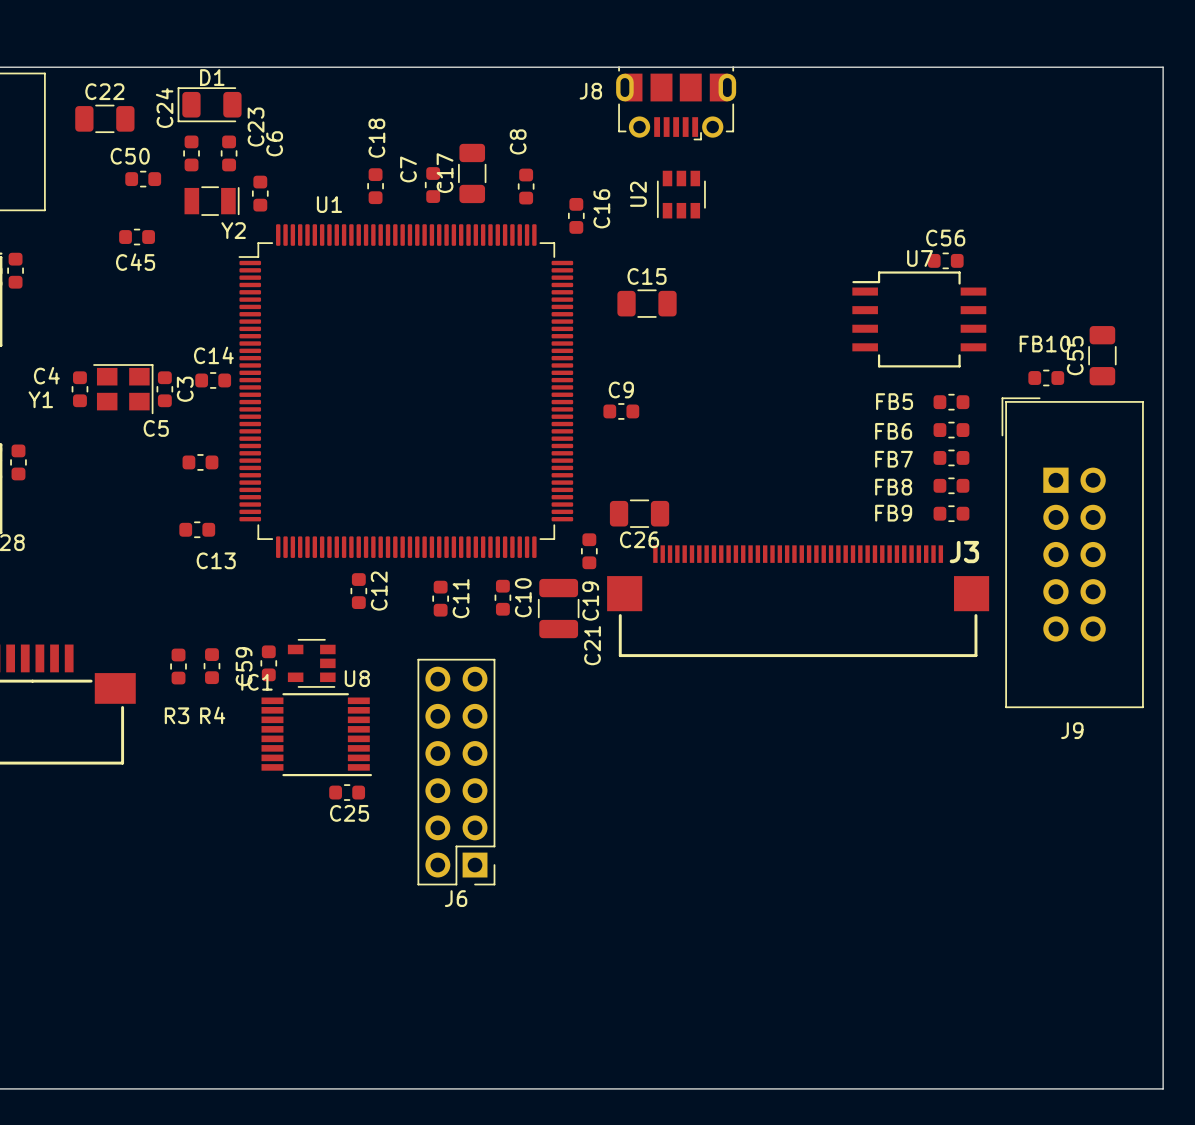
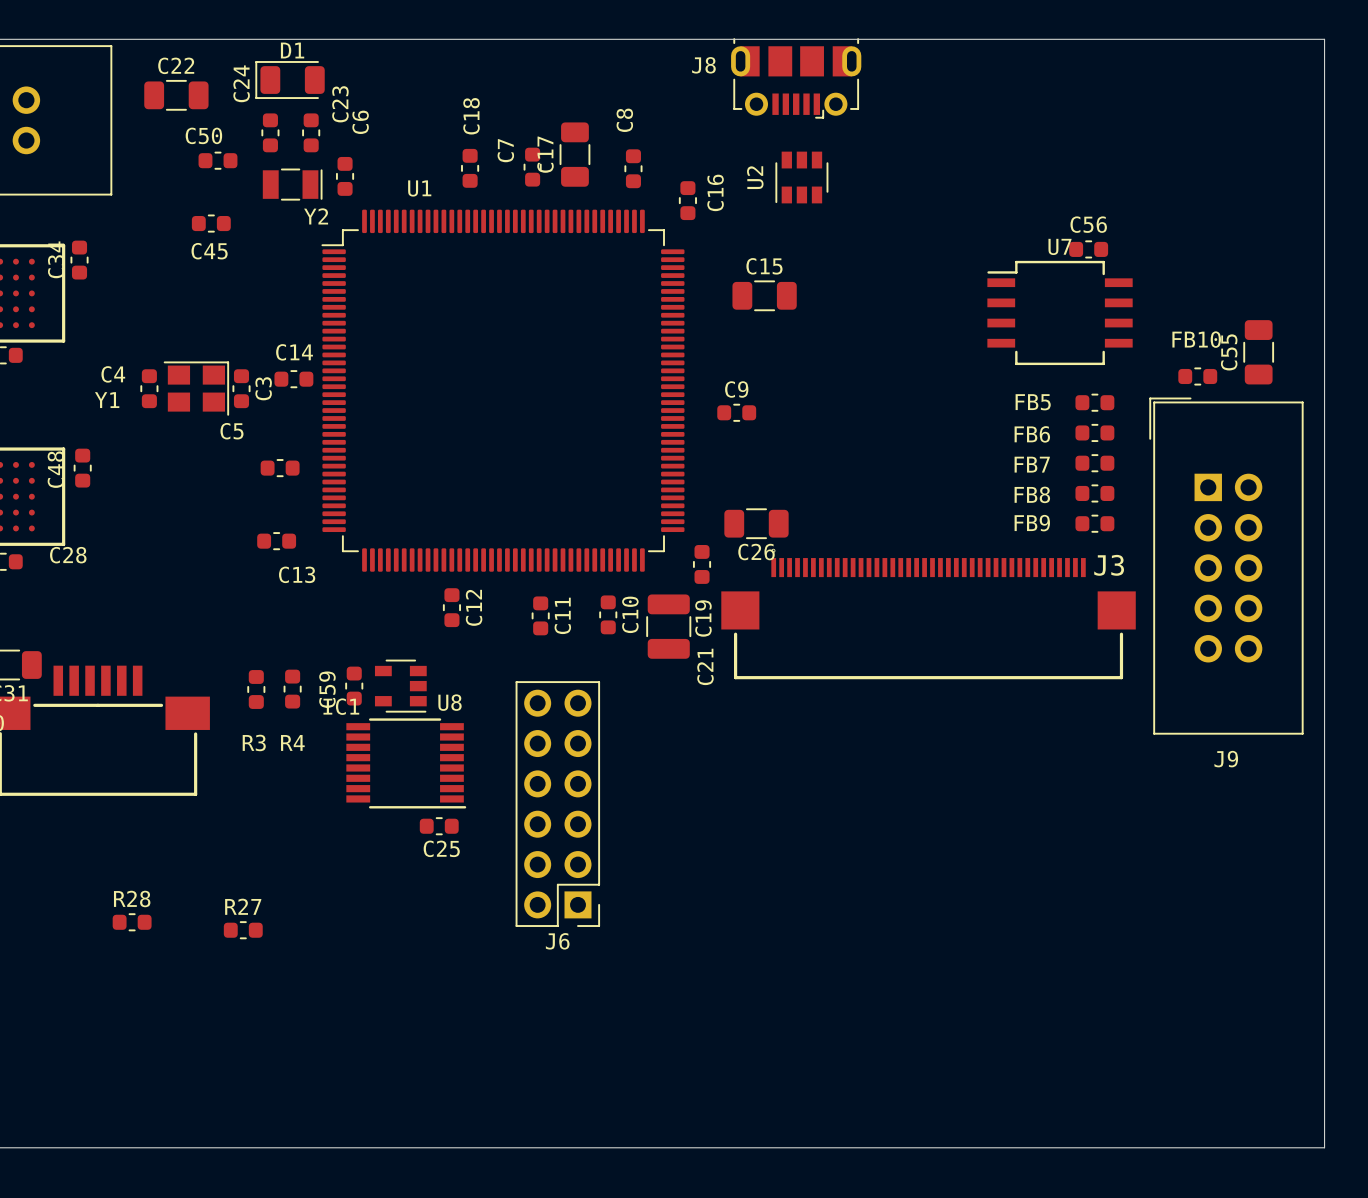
R28: none -> (132, 922)
R27: none -> (243, 930)

